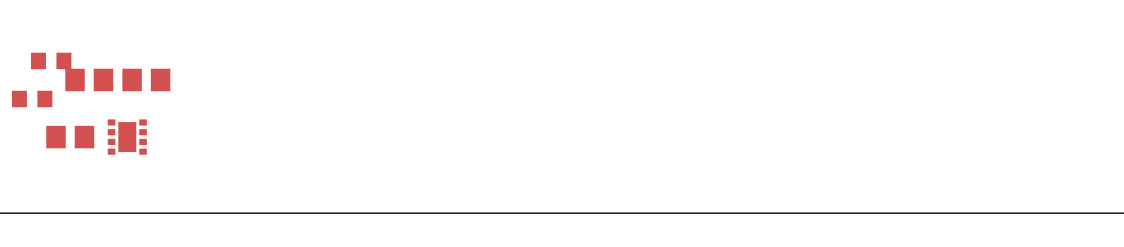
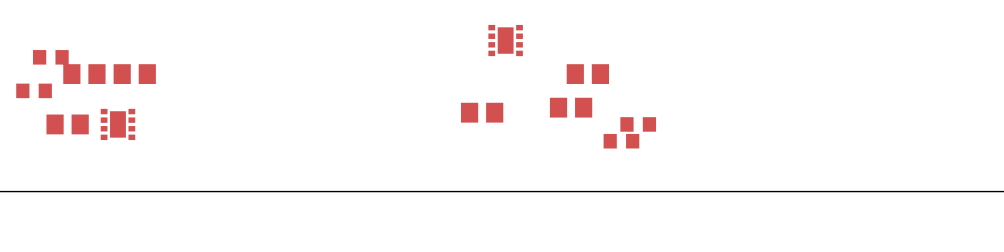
part: none -> (505, 40)
part: none -> (587, 74)
part: none -> (571, 107)
part: none -> (482, 112)
part: none -> (638, 124)
part: none -> (621, 141)

